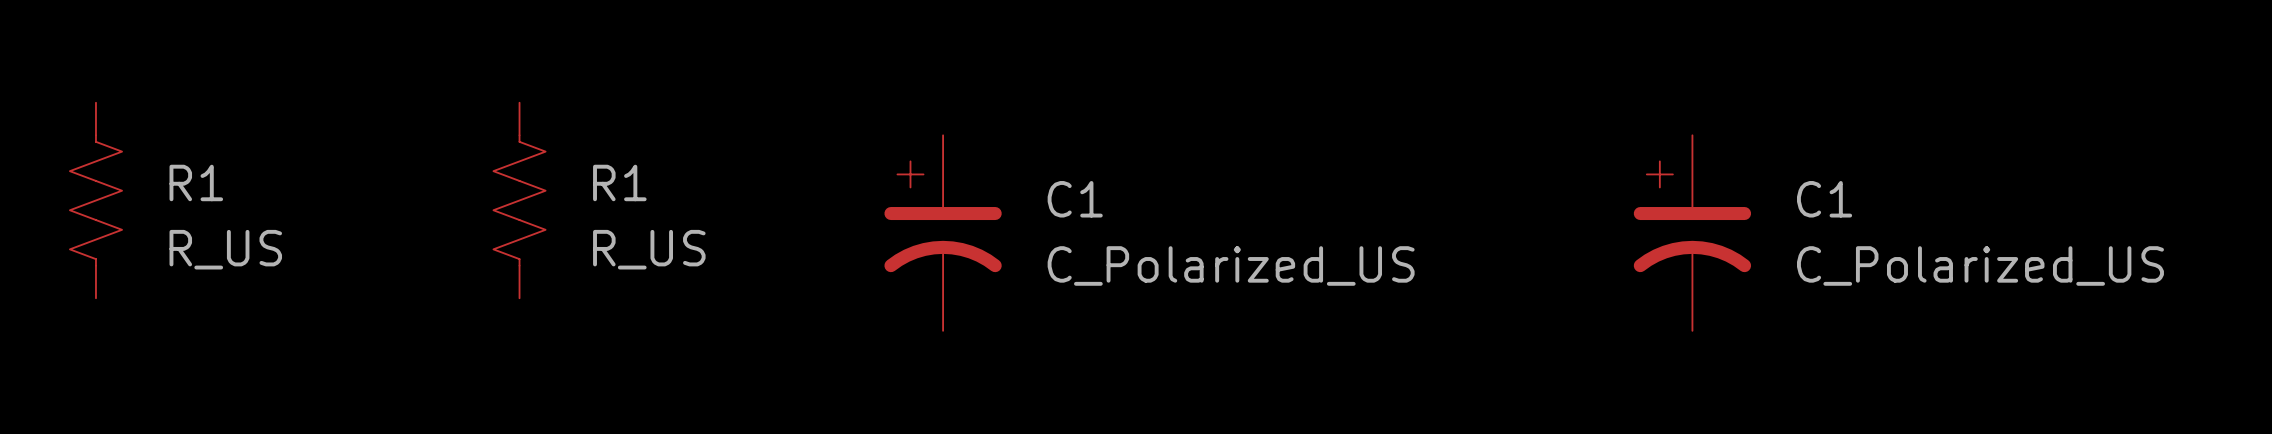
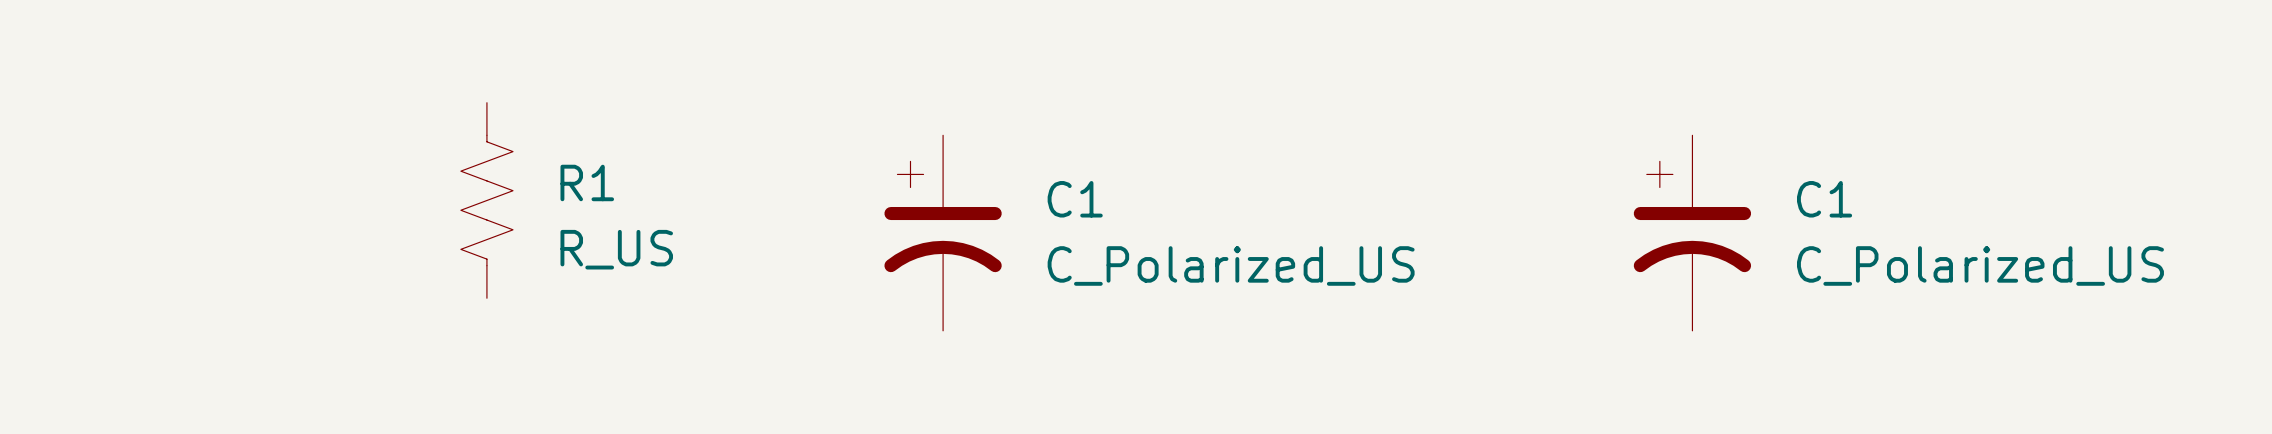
R1: R_US (95, 200) -> none
R1 position: (519, 200) -> (486, 200)

